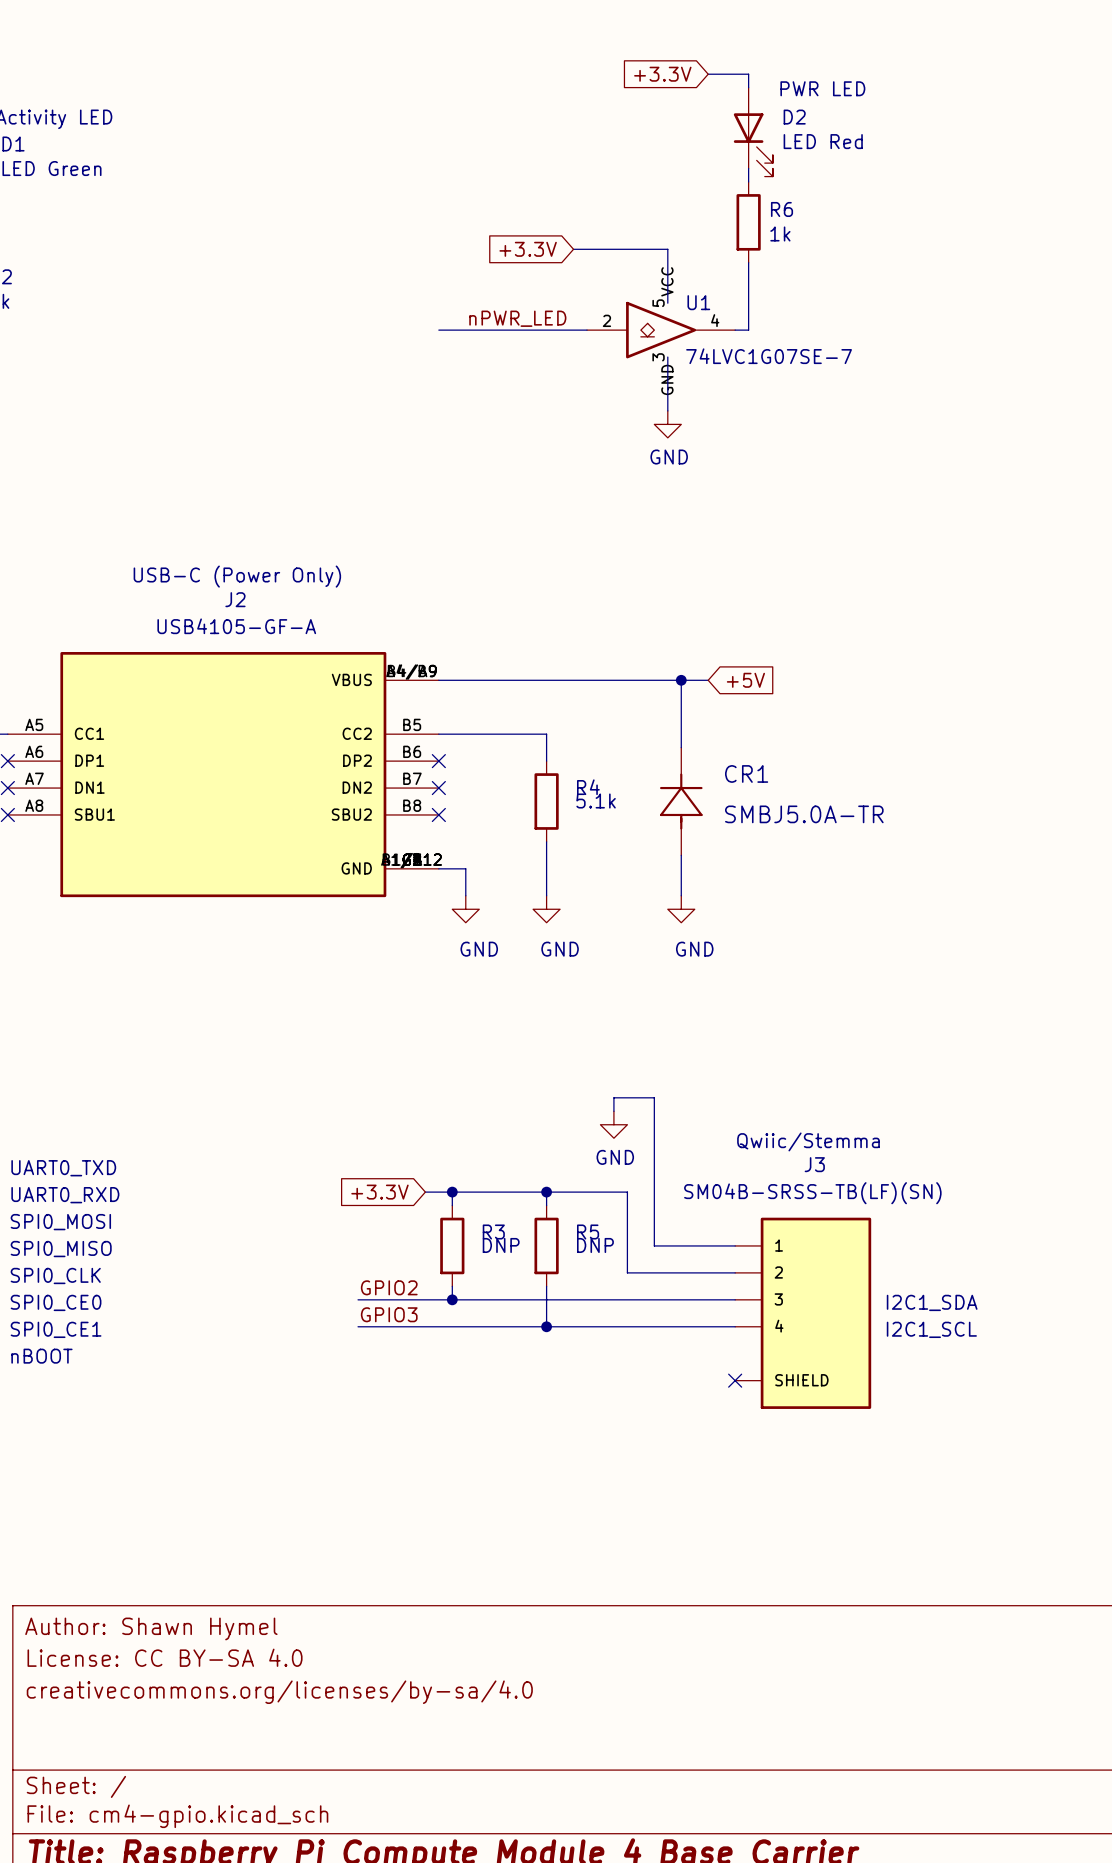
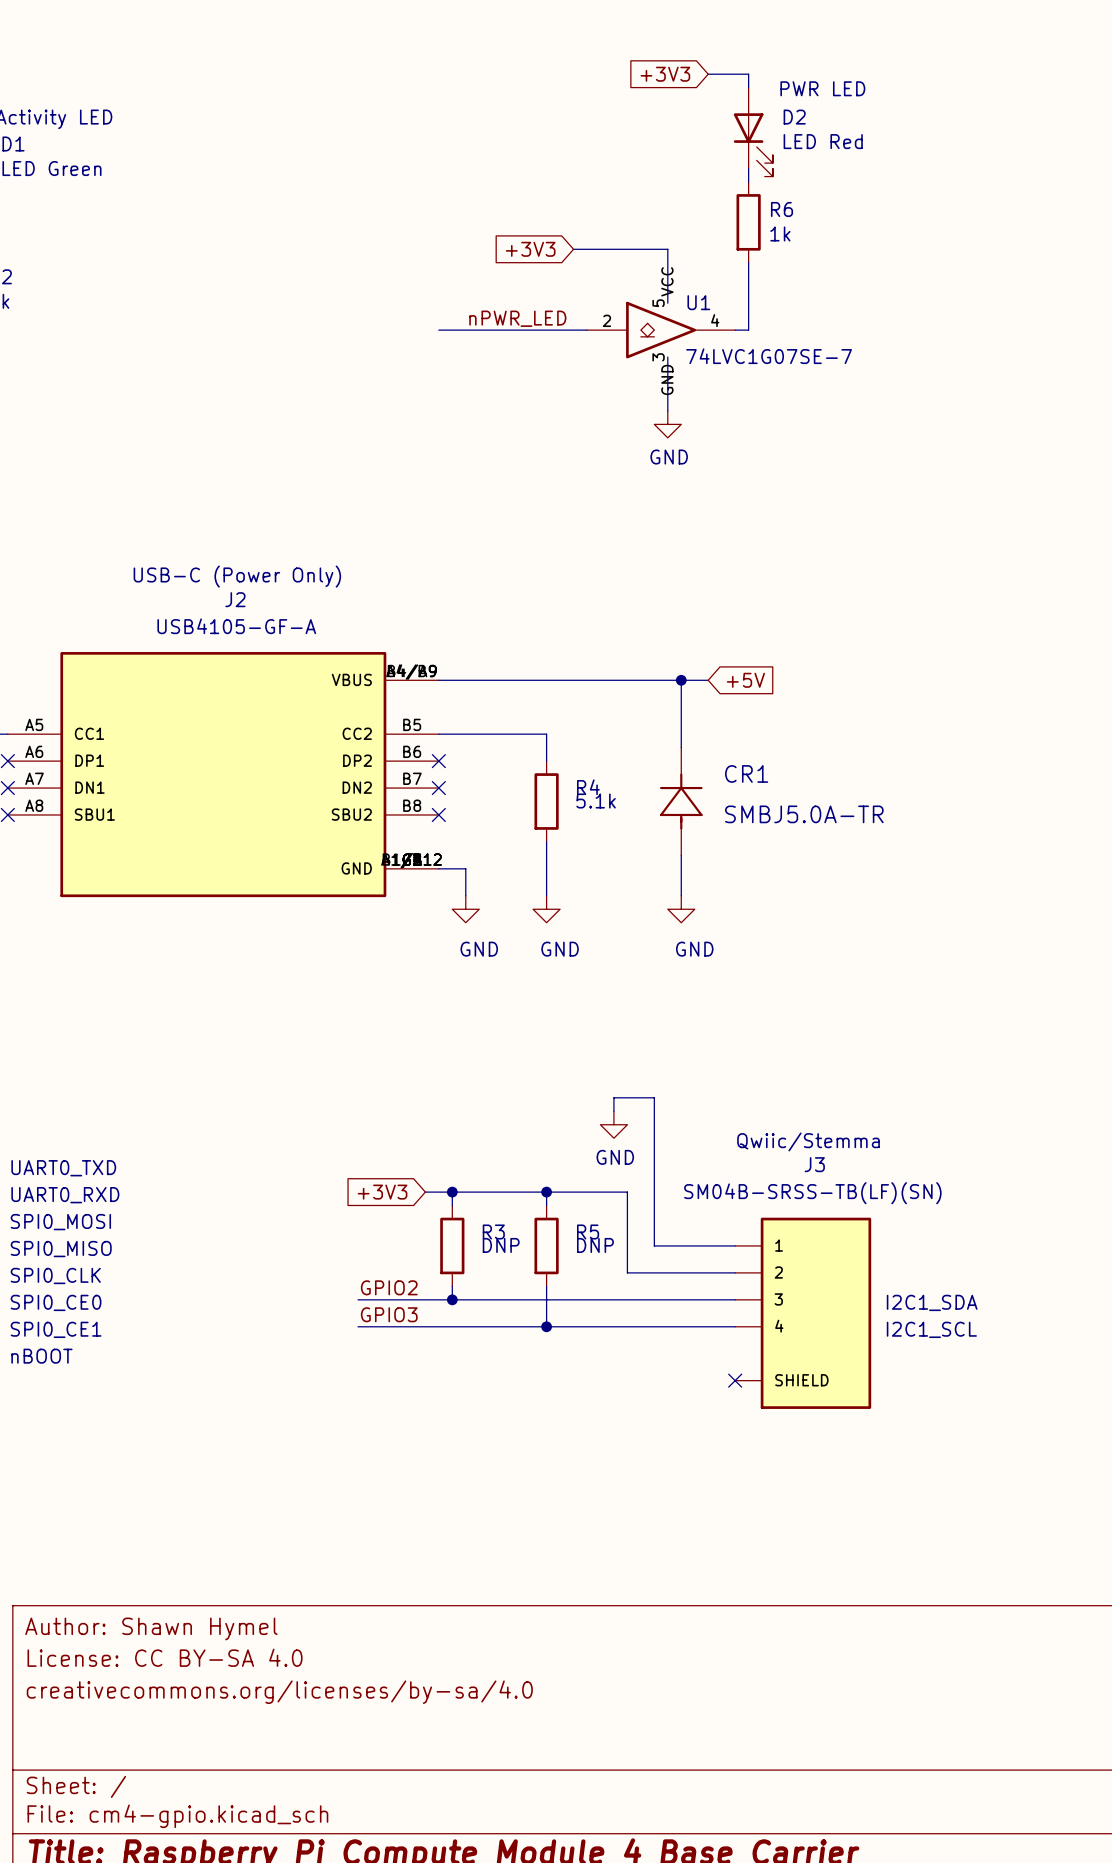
global label: +3.3V (662, 74) -> +3V3 (665, 74)
global label: +3.3V (528, 249) -> +3V3 (530, 249)
global label: +3.3V (379, 1192) -> +3V3 (382, 1192)

